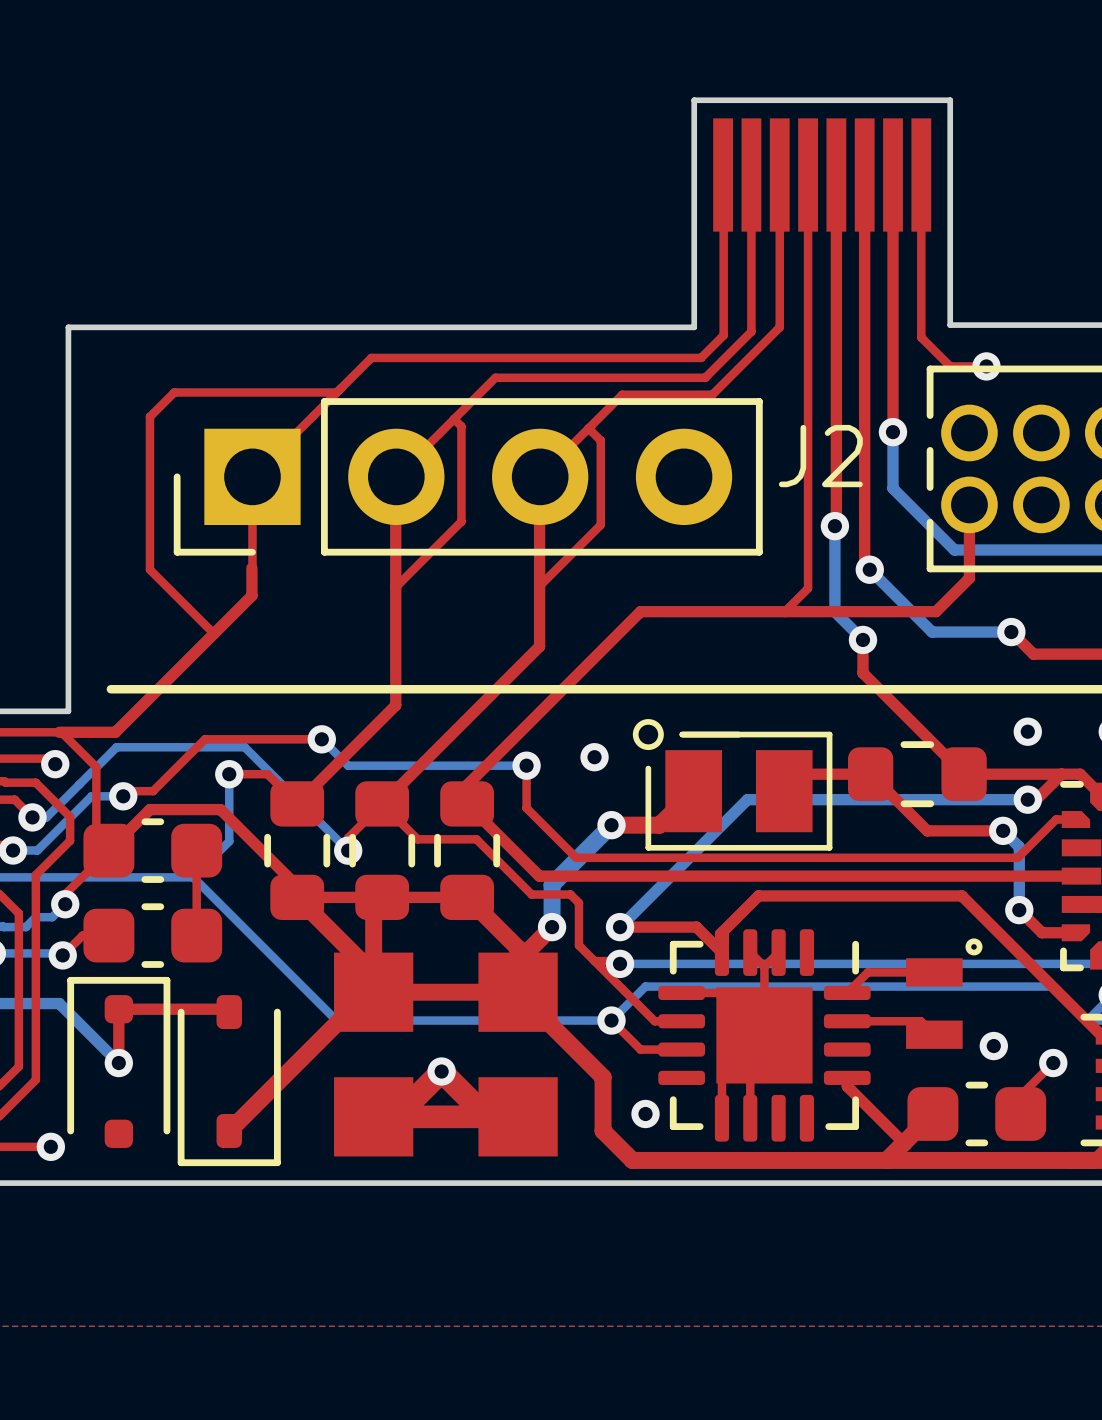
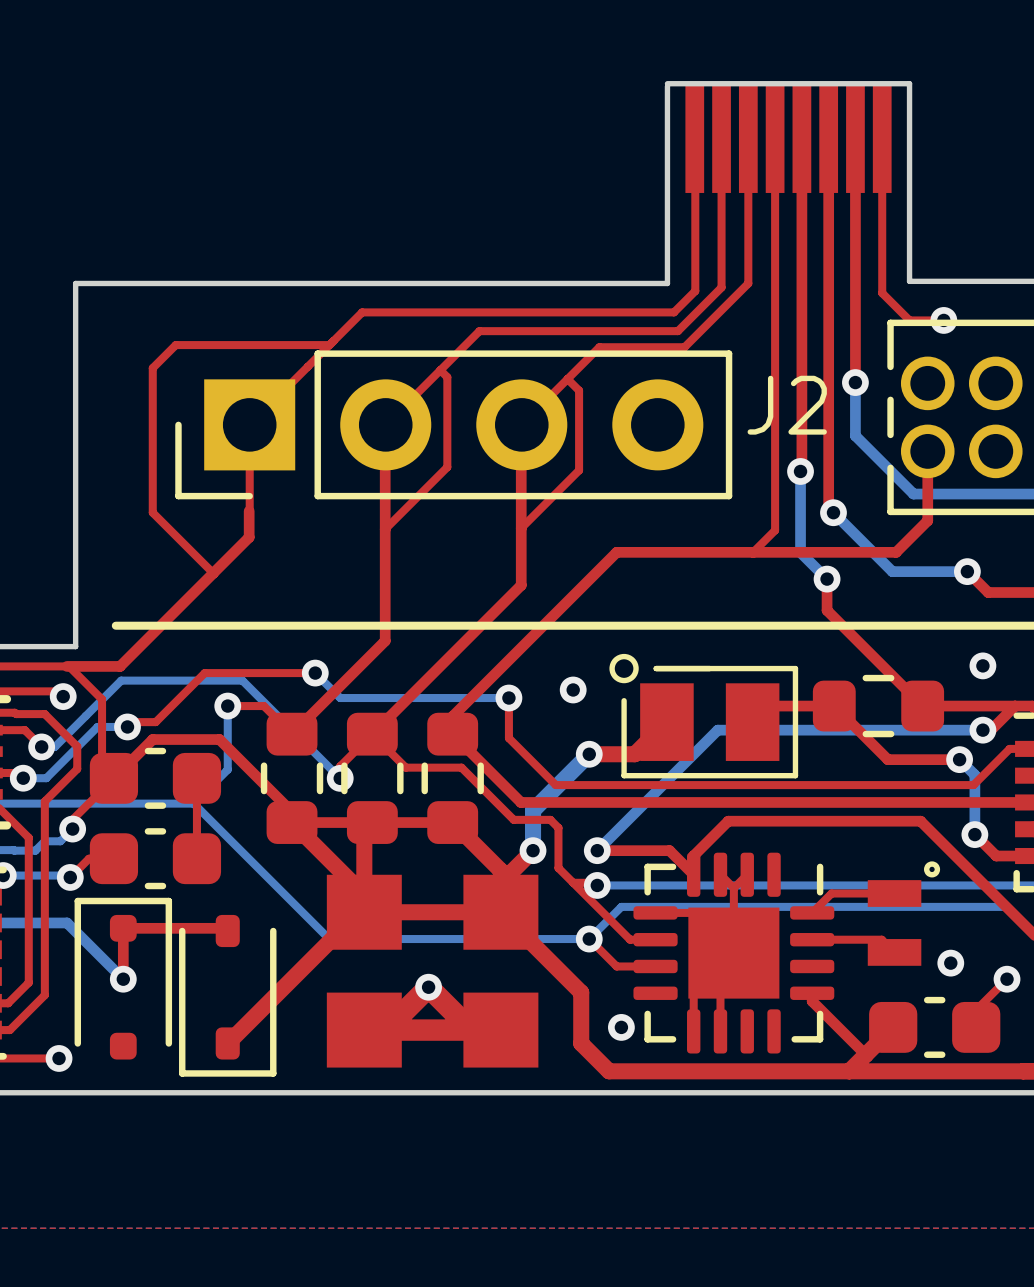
board edge: (950, 116) (950, 100) (694, 100) (694, 118) -> (909, 83) (667, 83)

